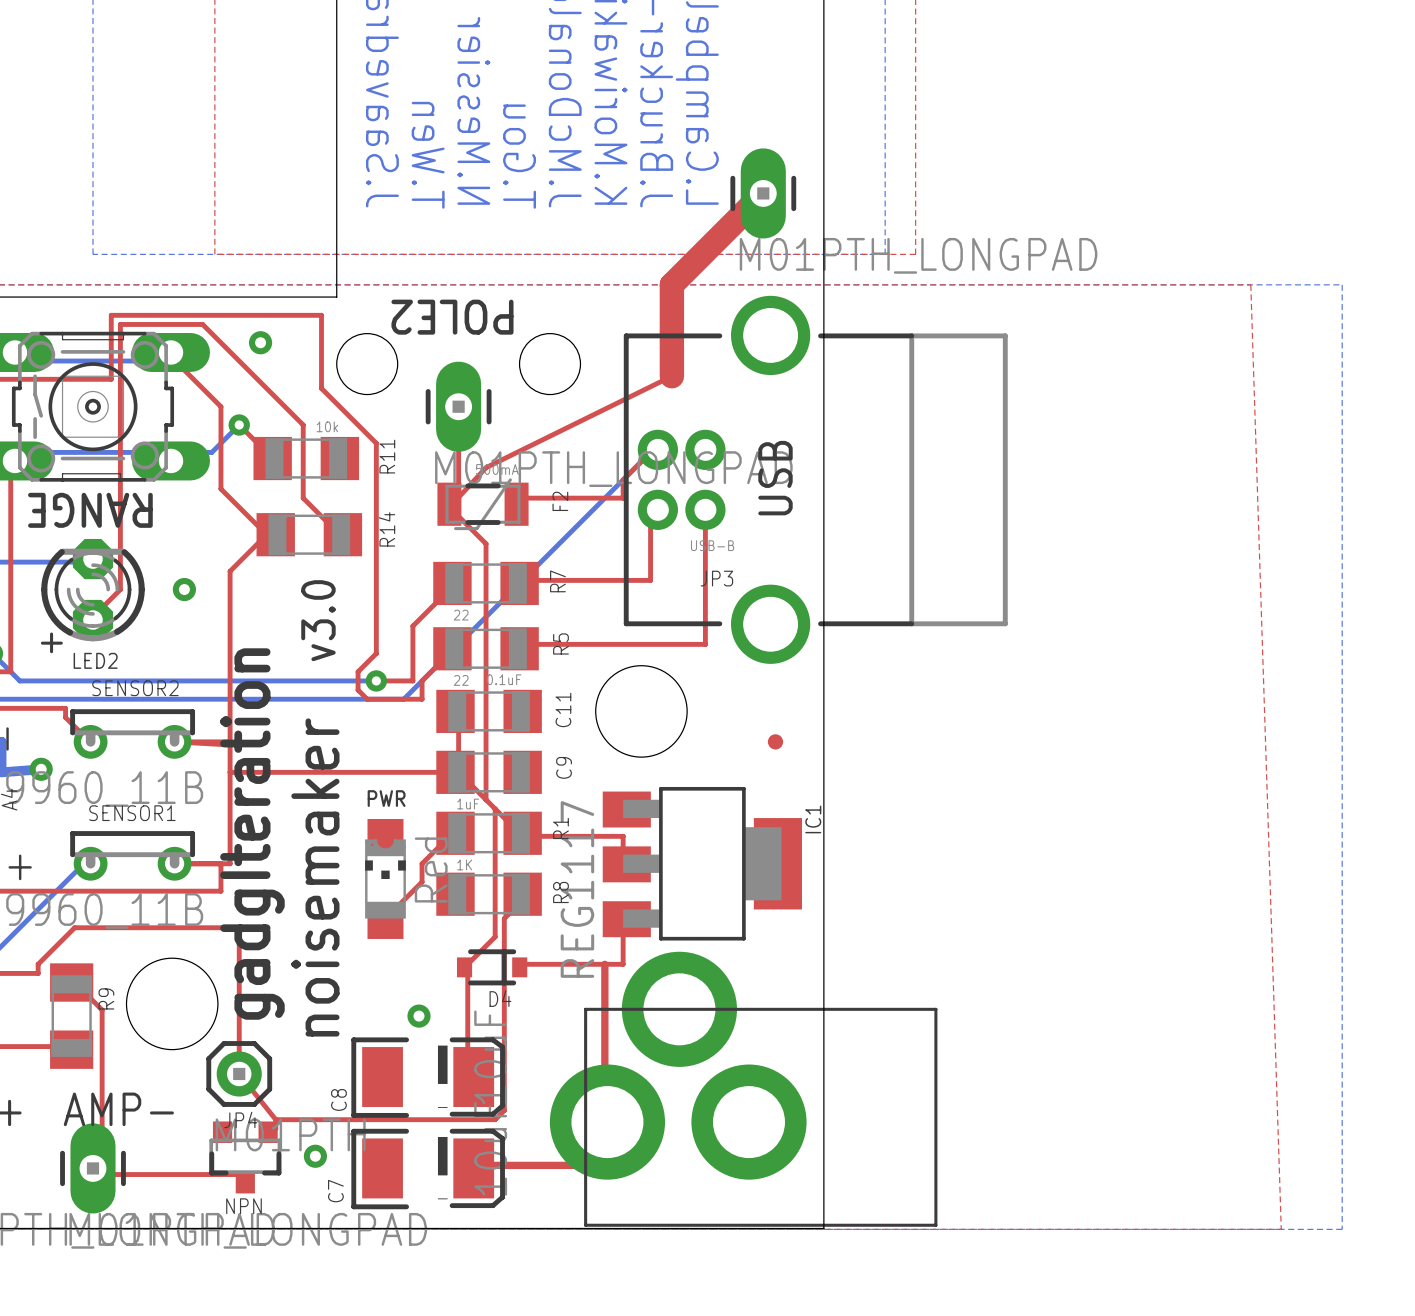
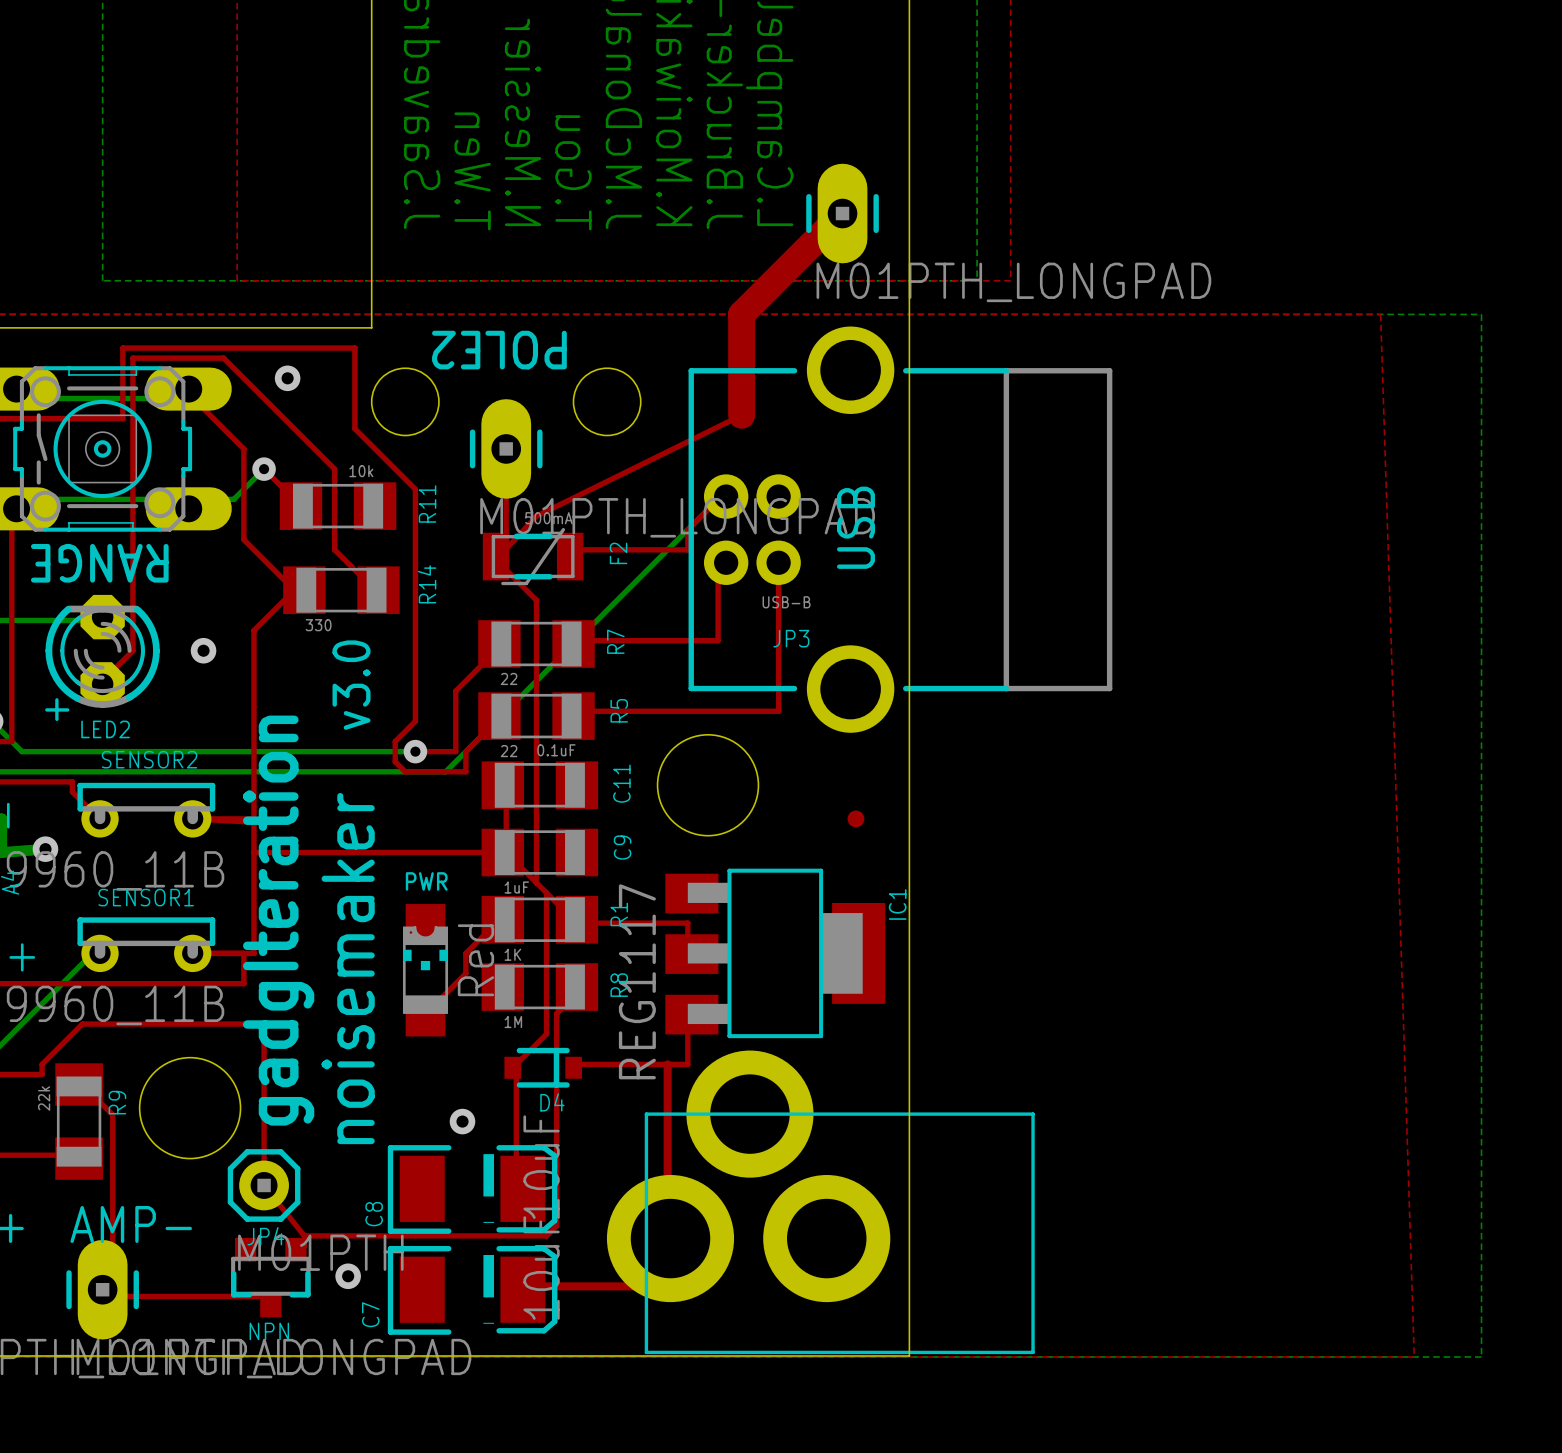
R14 value: none -> 330 (318, 625)
R8 value: none -> 1M (513, 1022)
R9 value: none -> 22k (44, 1098)

